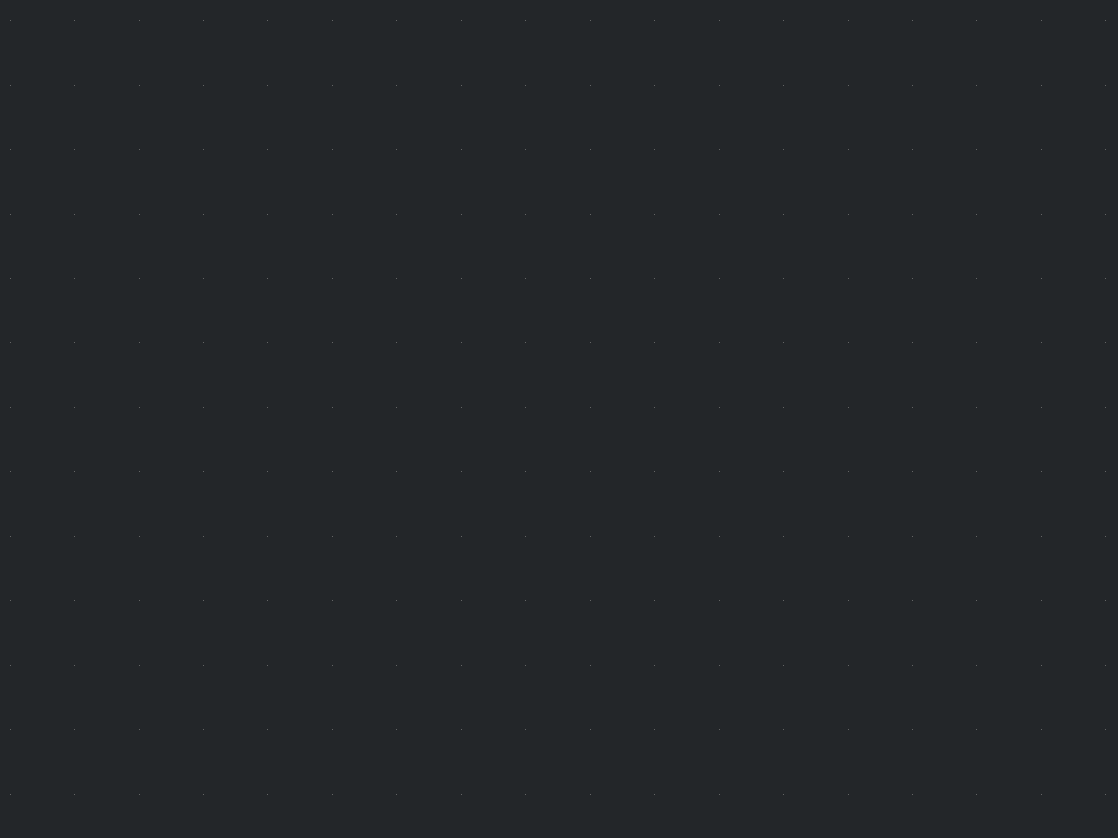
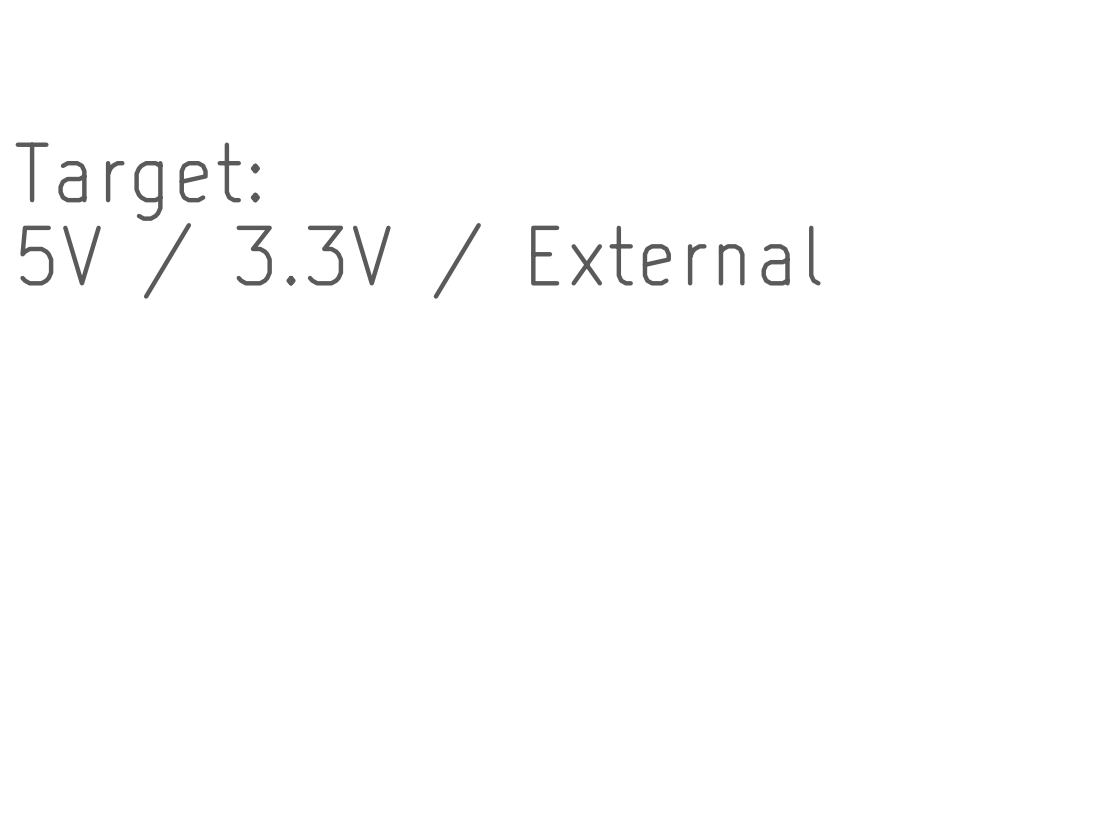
text: none -> Target: (137, 181)
text: none -> 5V / 3.3V / External (420, 260)

